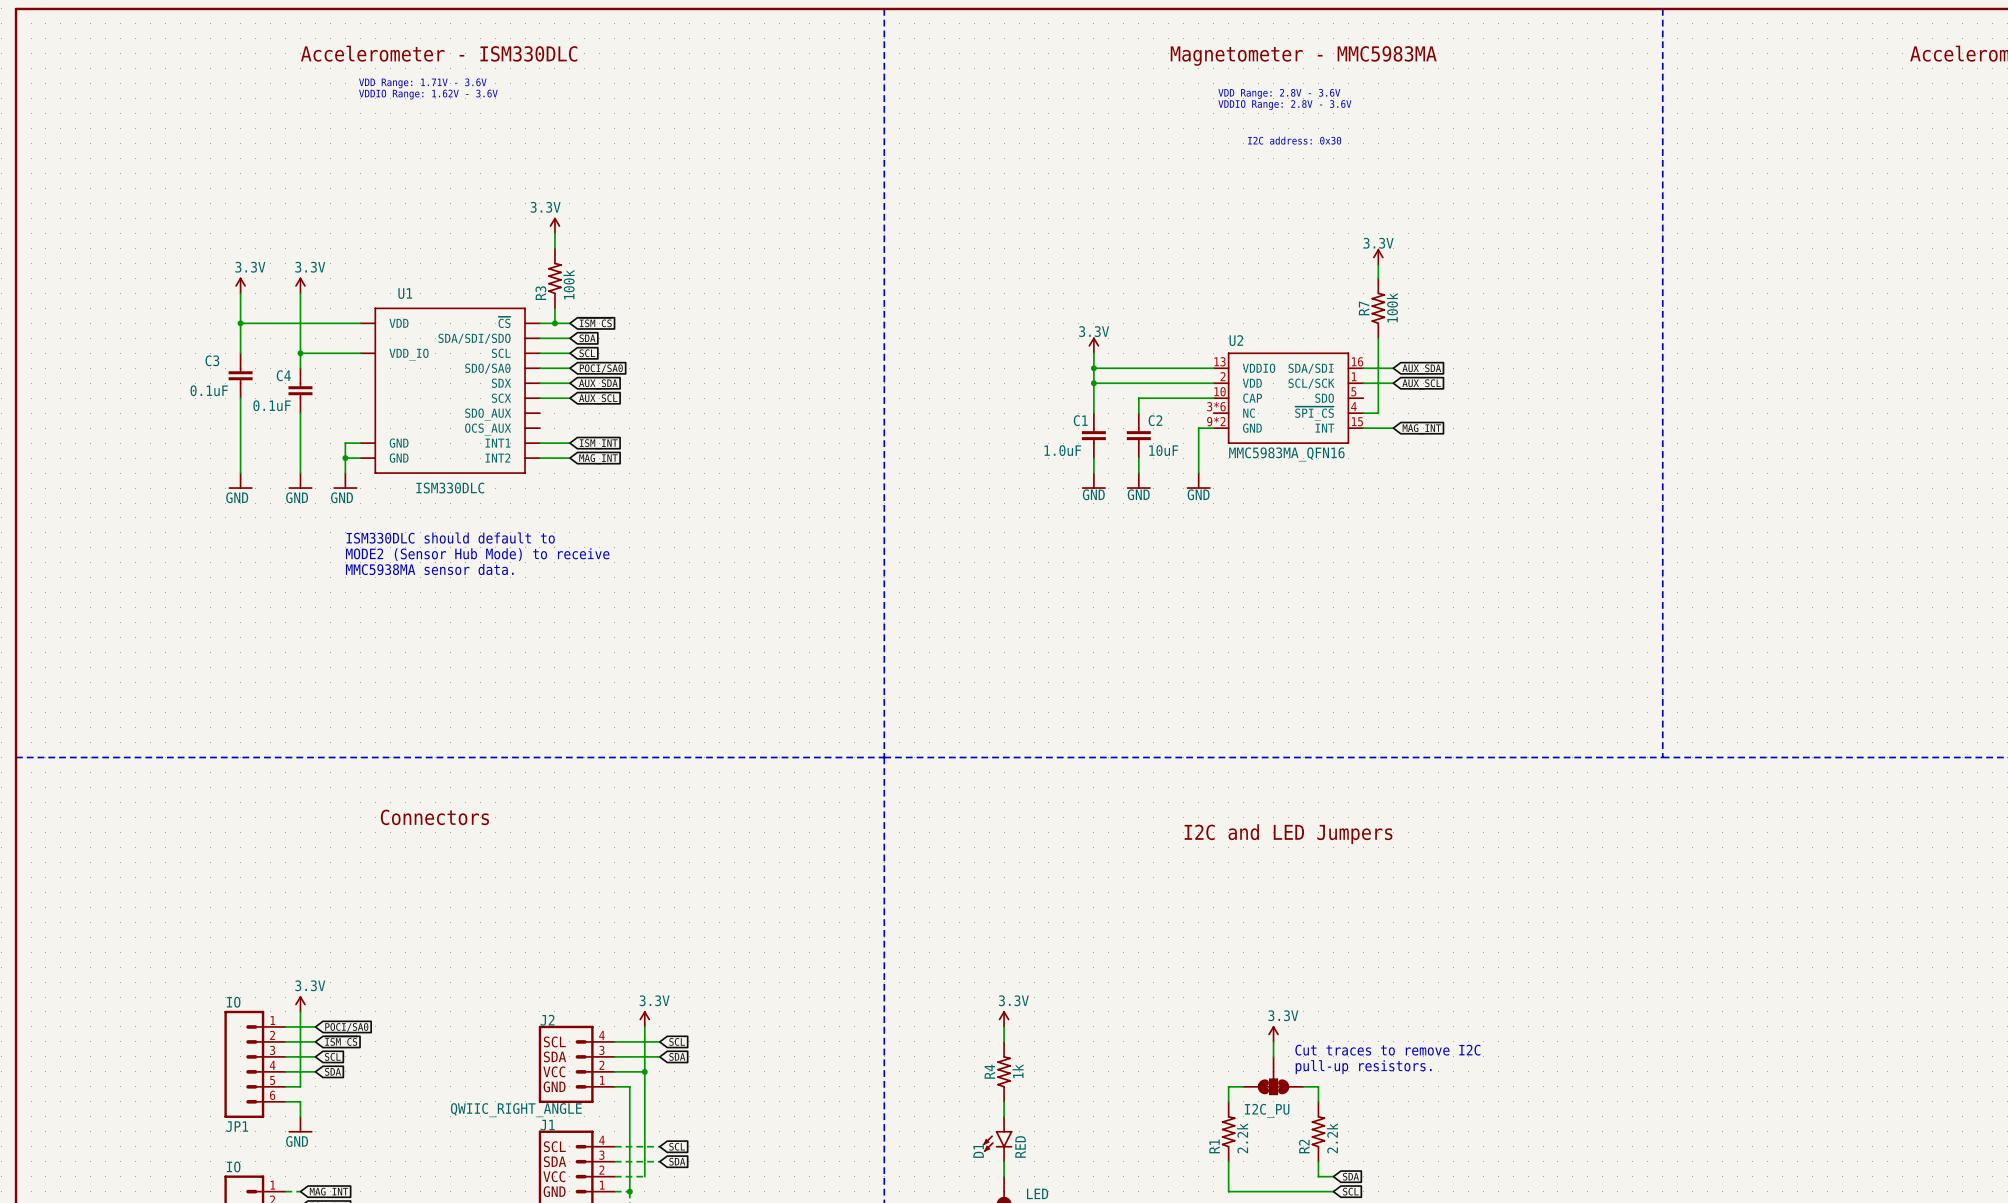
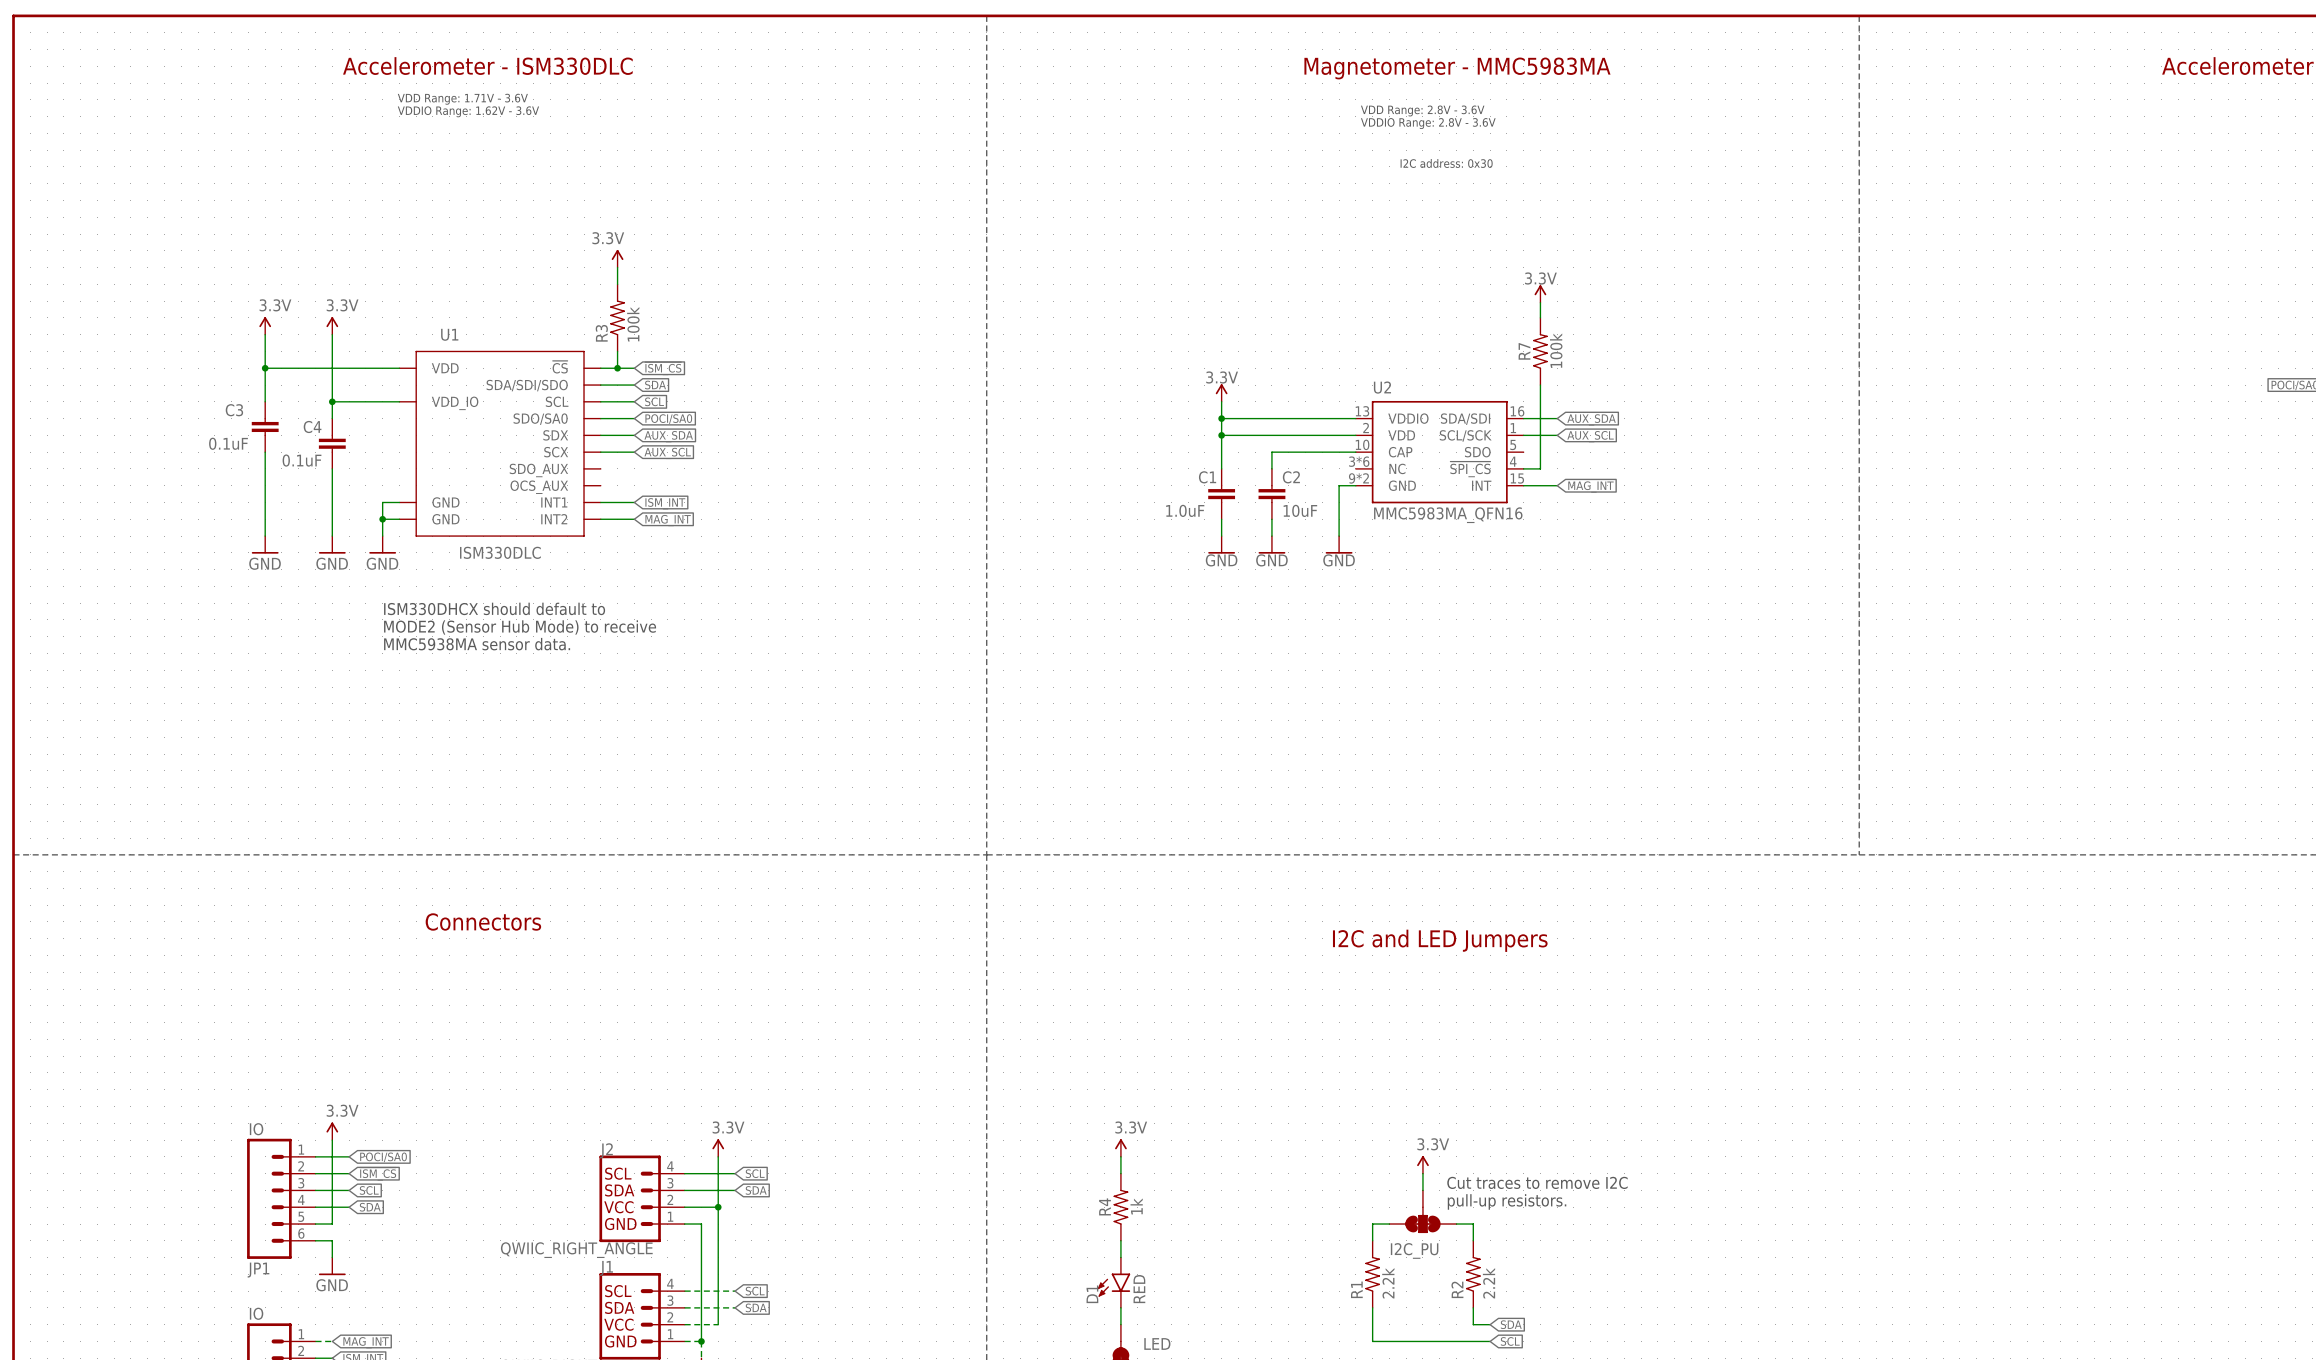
text: ISM330DLC should default to (450, 538) -> ISM330DHCX should default to (494, 608)

